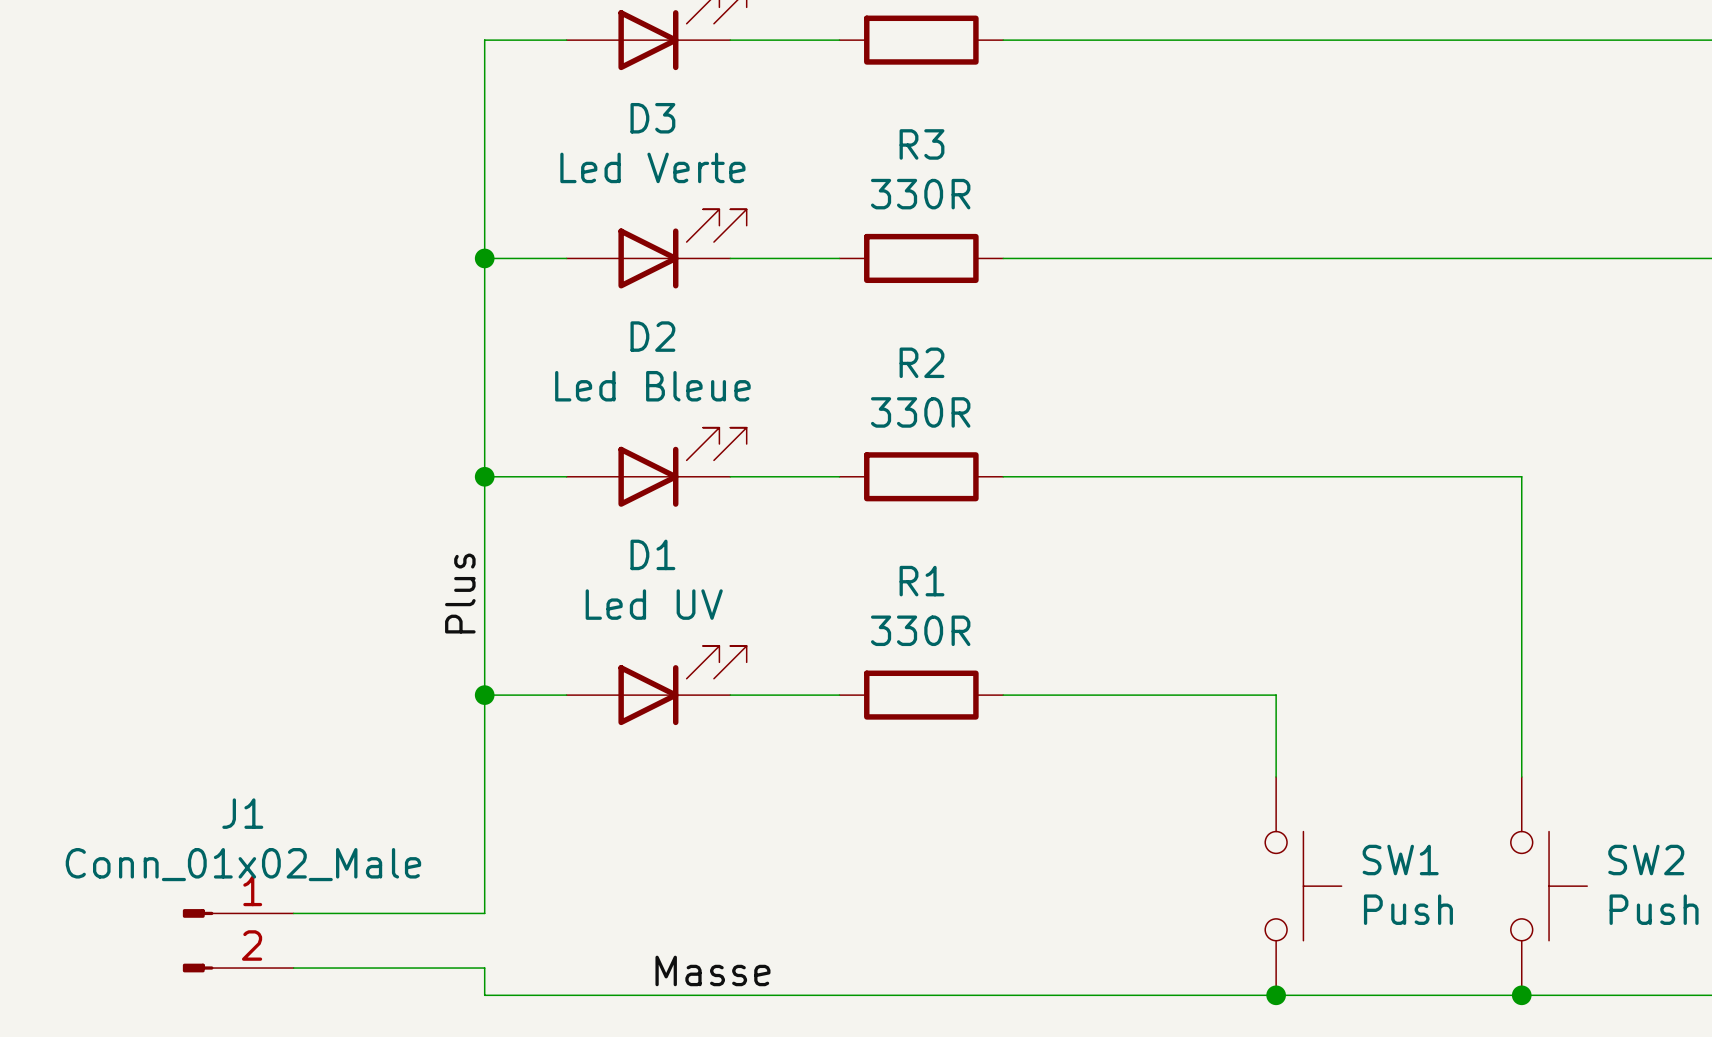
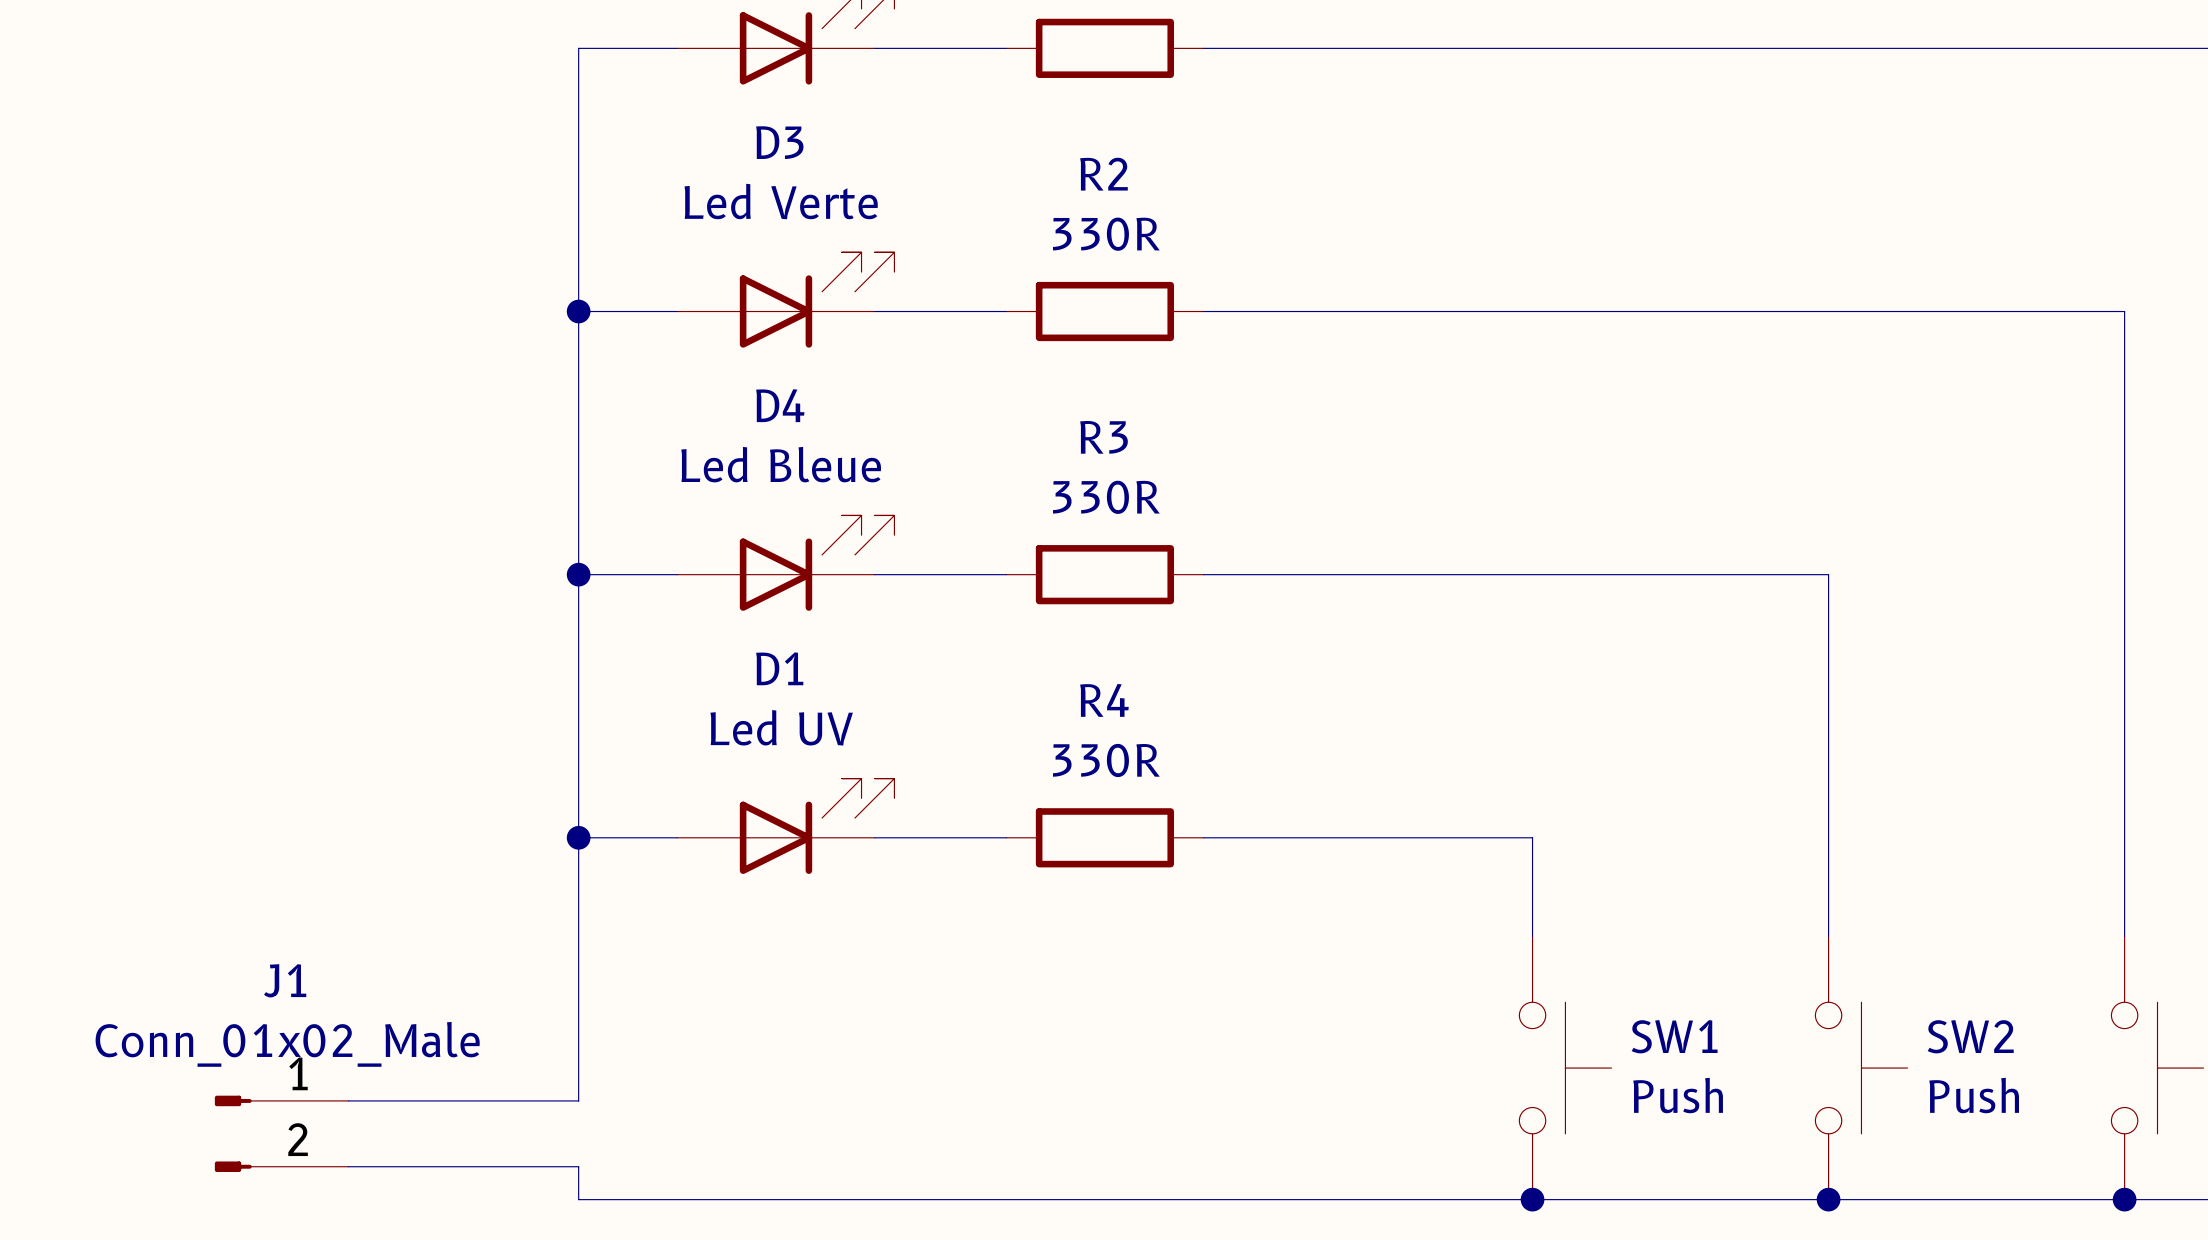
R3 name: R3 (921, 144) -> R2 (1103, 174)
D2 name: D2 (652, 336) -> D4 (780, 405)
R2 name: R2 (921, 362) -> R3 (1103, 437)
R1 name: R1 (921, 581) -> R4 (1104, 700)
label: Plus (460, 593) -> none
label: Masse (712, 970) -> none

